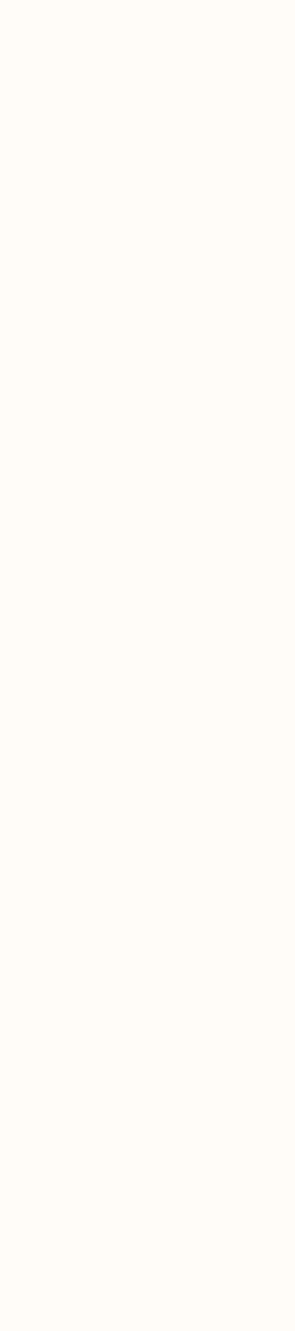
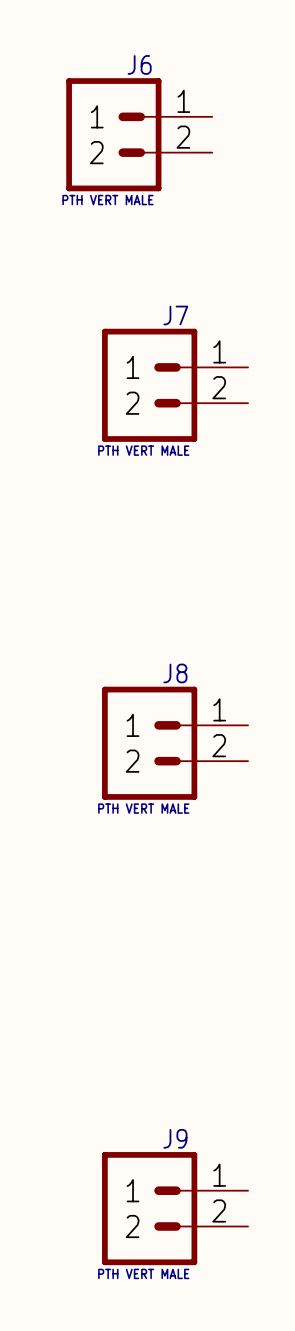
J6: none -> PTH VERT MALE (139, 134)
J7: none -> PTH VERT MALE (175, 385)
J8: none -> PTH VERT MALE (175, 743)
J9: none -> PTH VERT MALE (175, 1208)

